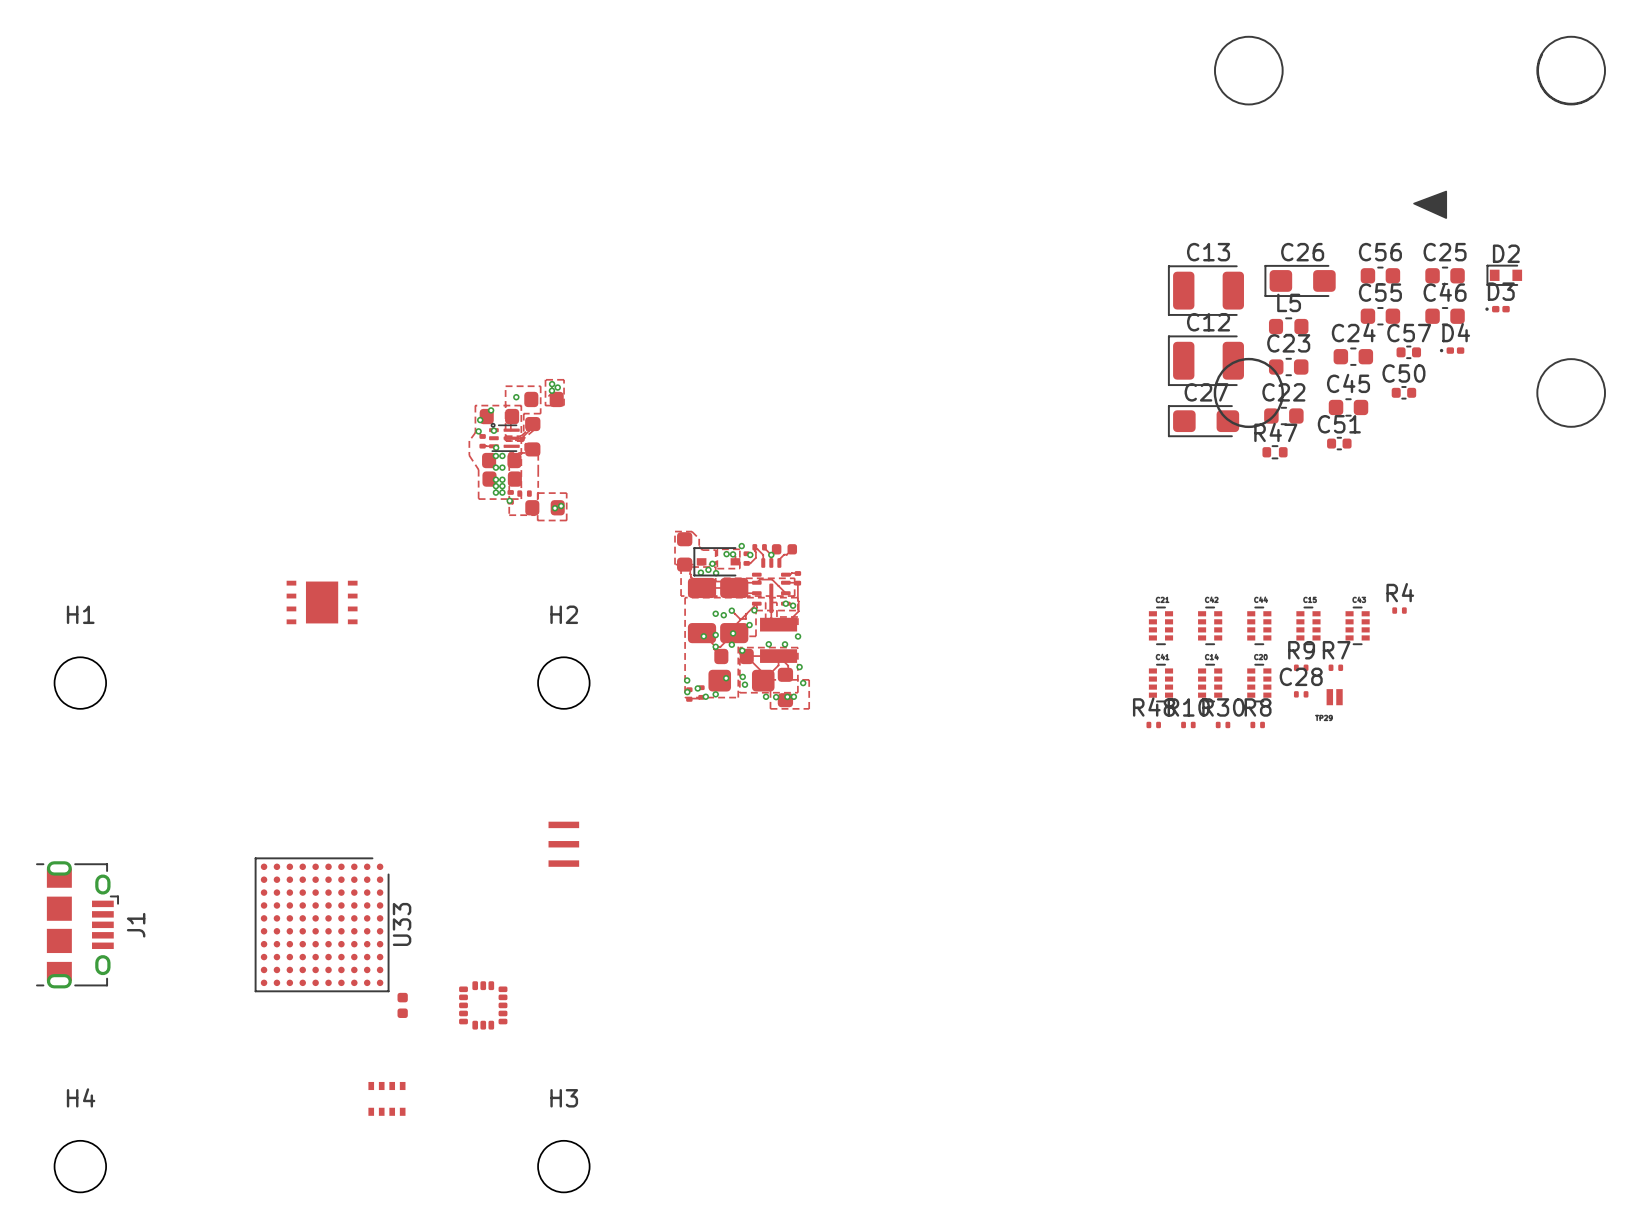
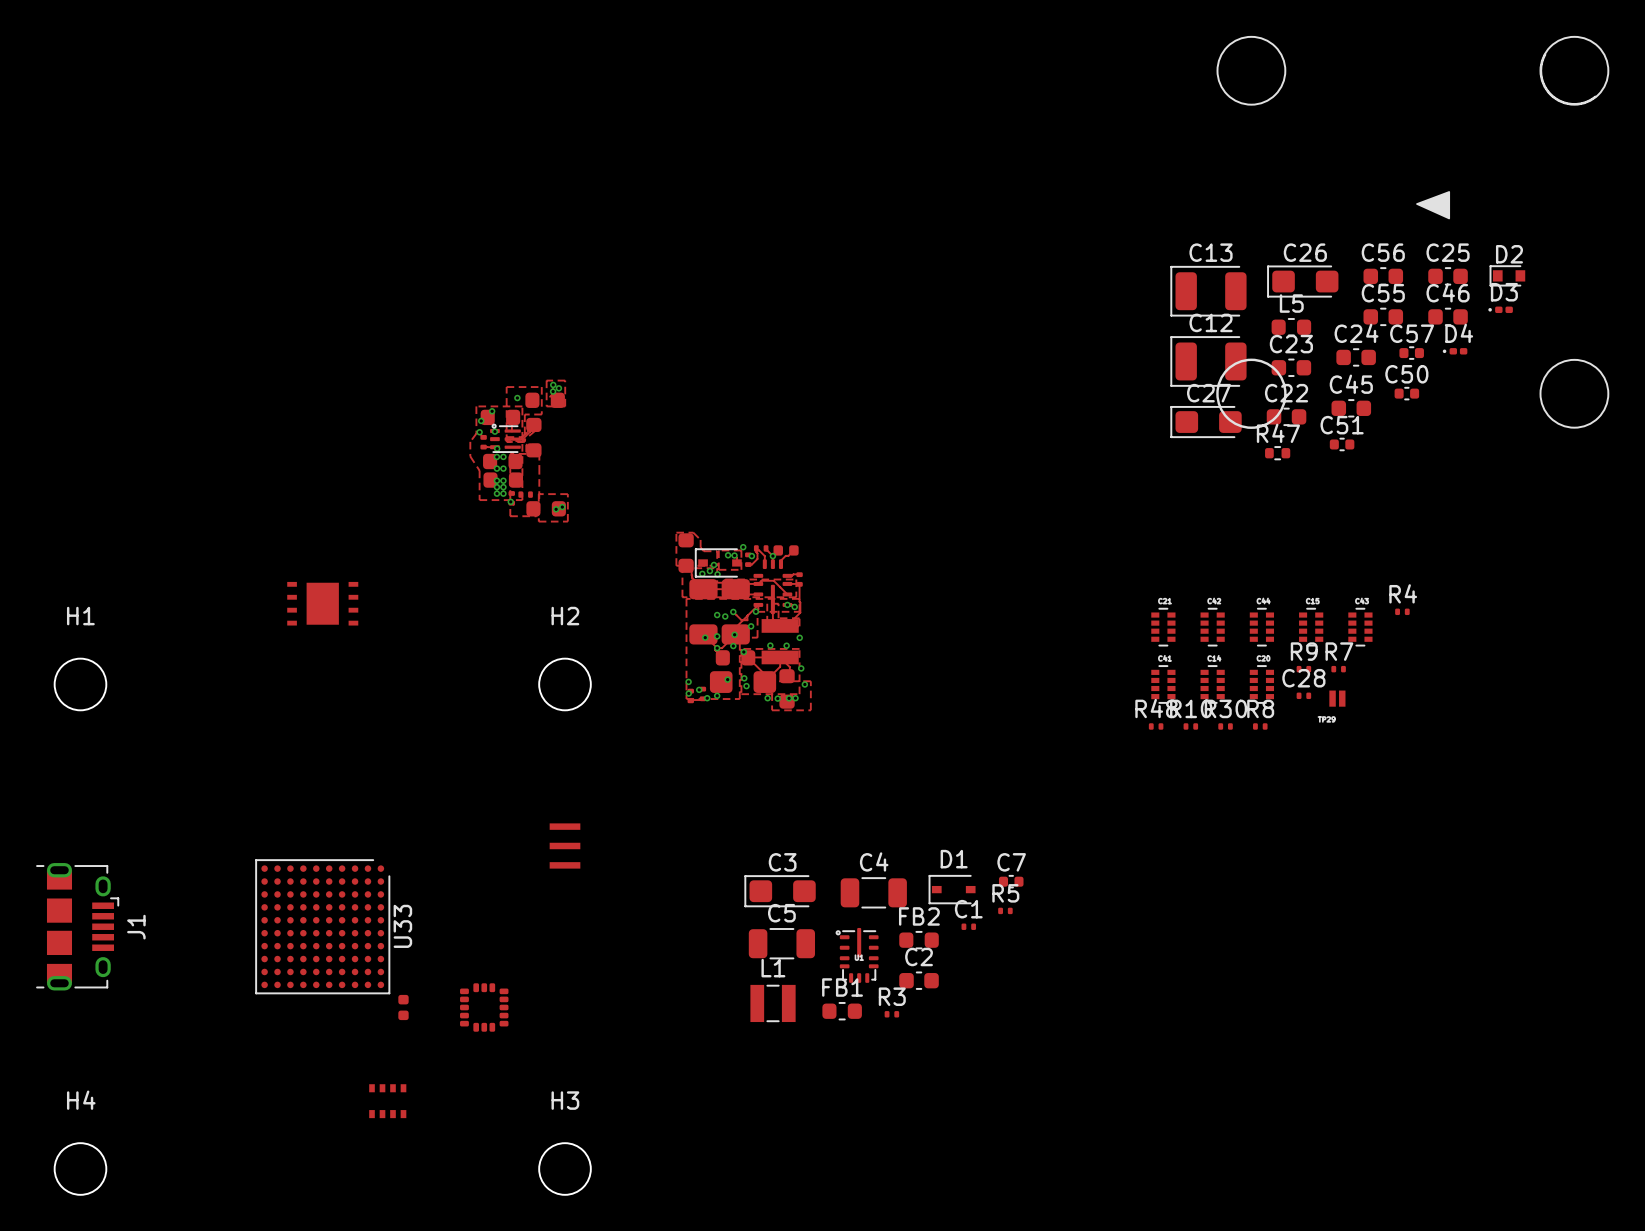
C7: none -> (1011, 881)
D1: none -> (952, 889)
C3: none -> (780, 891)
C4: none -> (873, 892)
R5: none -> (1005, 910)
C1: none -> (968, 926)
FB2: none -> (919, 940)
C5: none -> (781, 943)
part: none -> (857, 955)
C2: none -> (919, 980)
L1: none -> (773, 1003)
FB1: none -> (842, 1011)
R3: none -> (891, 1014)

